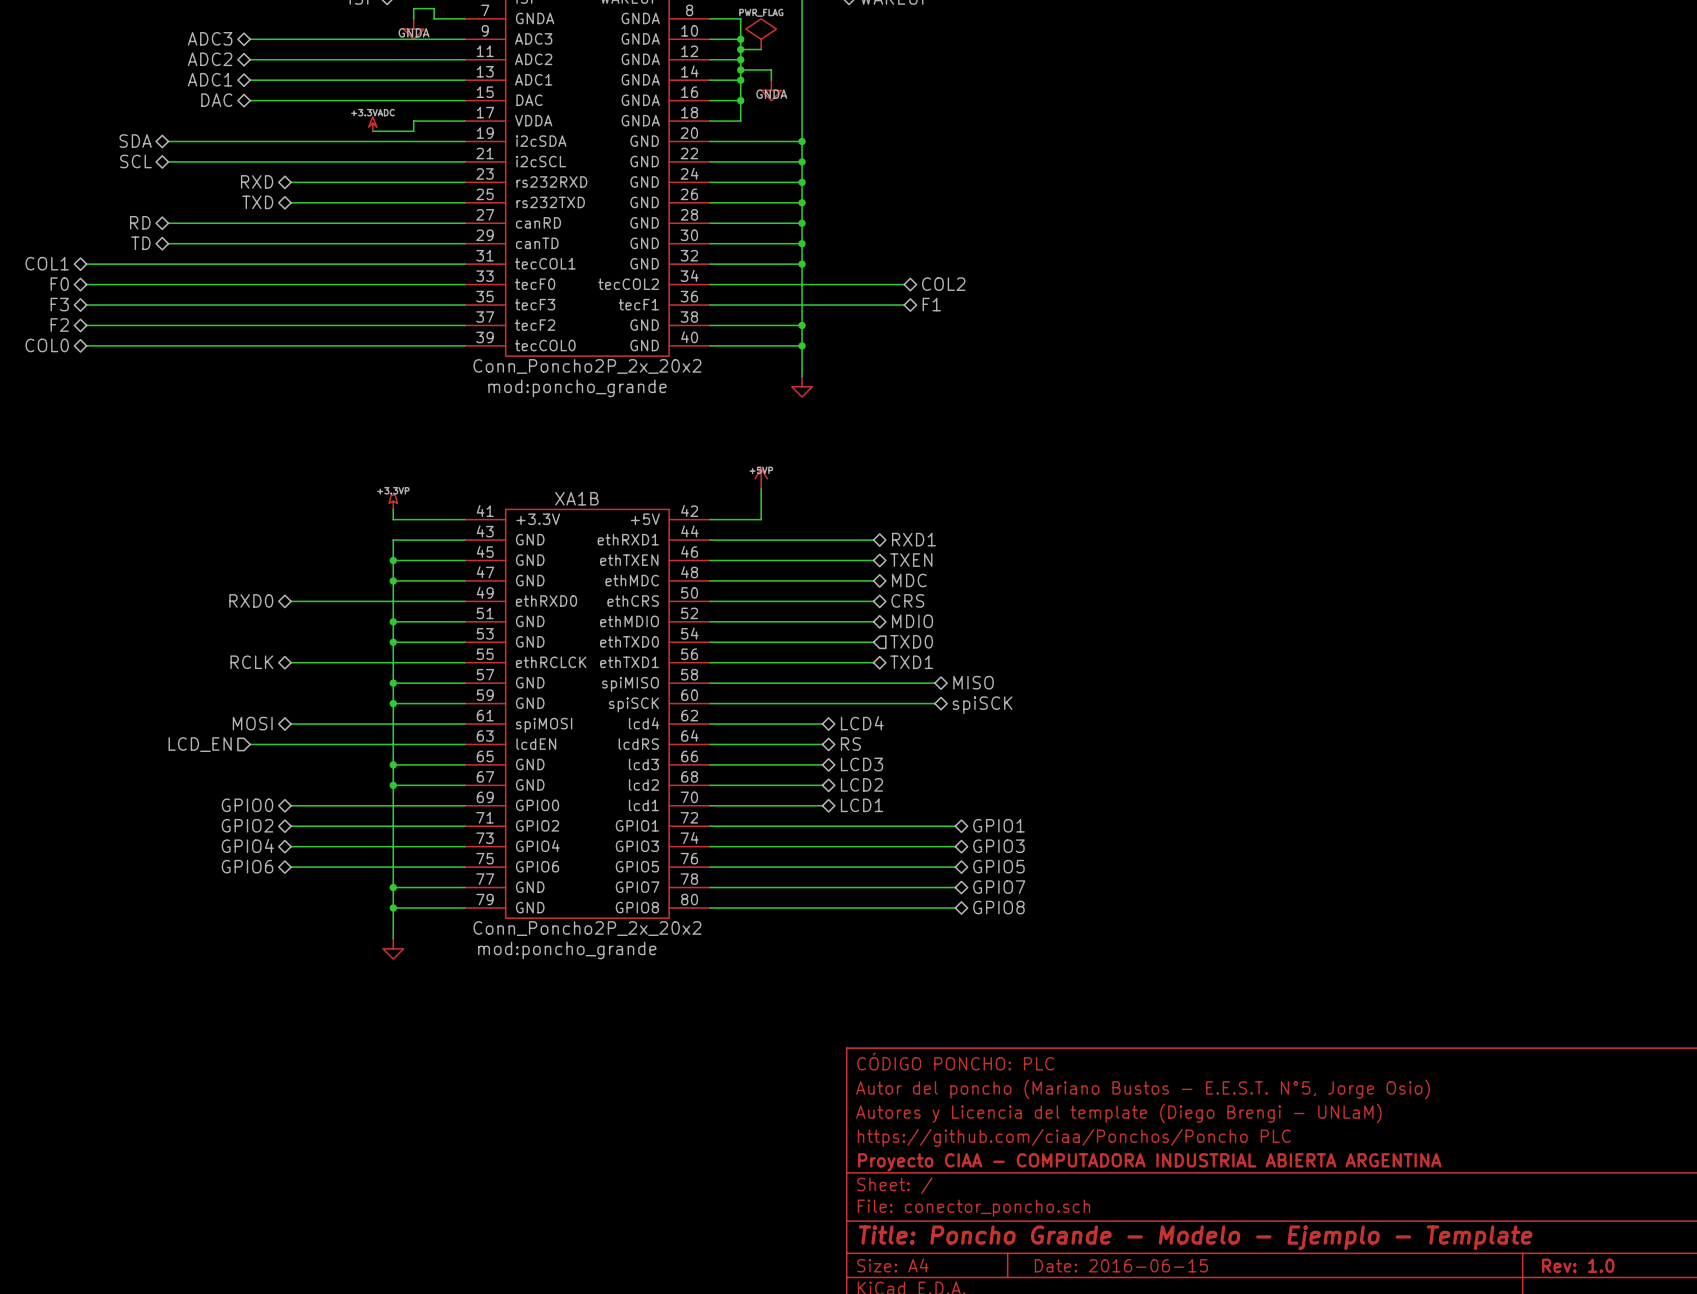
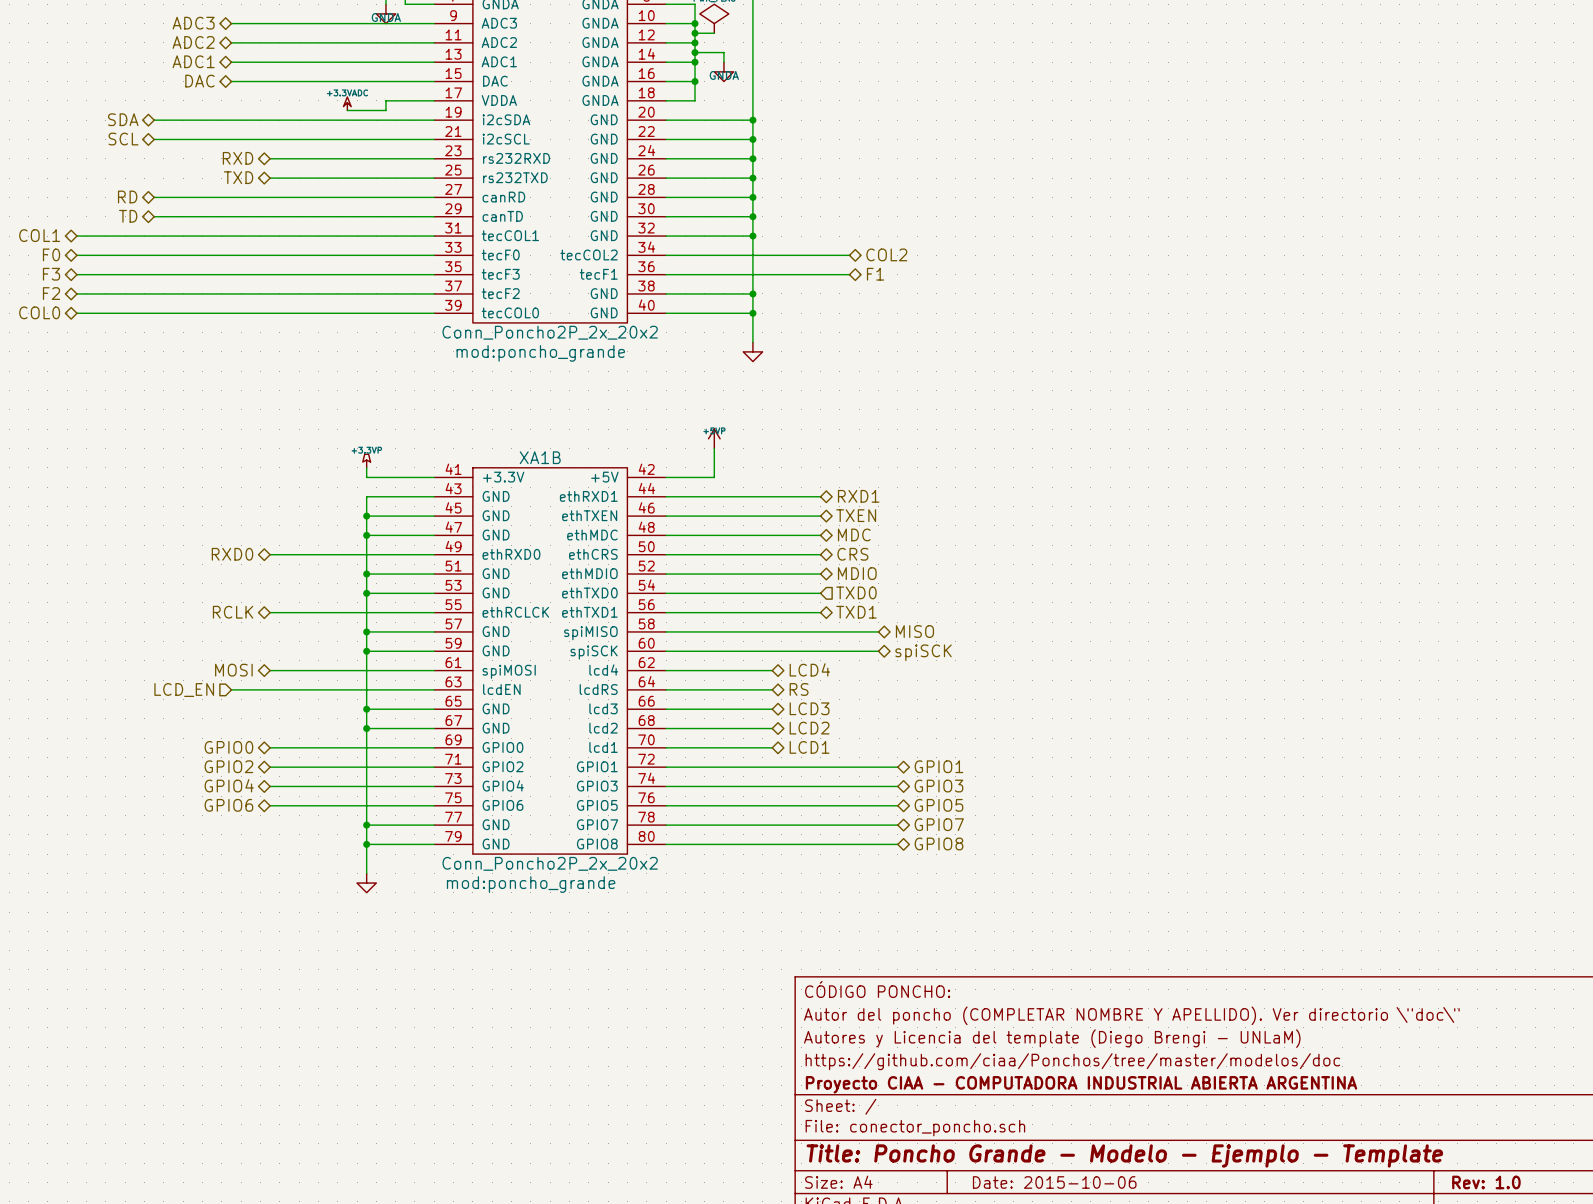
title block: CÓDIGO PONCHO: PLC (955, 1061) -> CÓDIGO PONCHO: (877, 989)
title block: Autor del poncho (Mariano Bustos - E.E.S.T. N°5, Jorge Osio) (1142, 1089) -> Autor del poncho (COMPLETAR NOMBRE Y APELLIDO). Ver directorio \"doc\" (1131, 1015)
title block: https://github.com/ciaa/Ponchos/Poncho PLC (1074, 1137) -> https://github.com/ciaa/Ponchos/tree/master/modelos/doc (1072, 1061)
title block: Date: 2016-06-15 (1121, 1265) -> Date: 2015-10-06 (1054, 1182)

